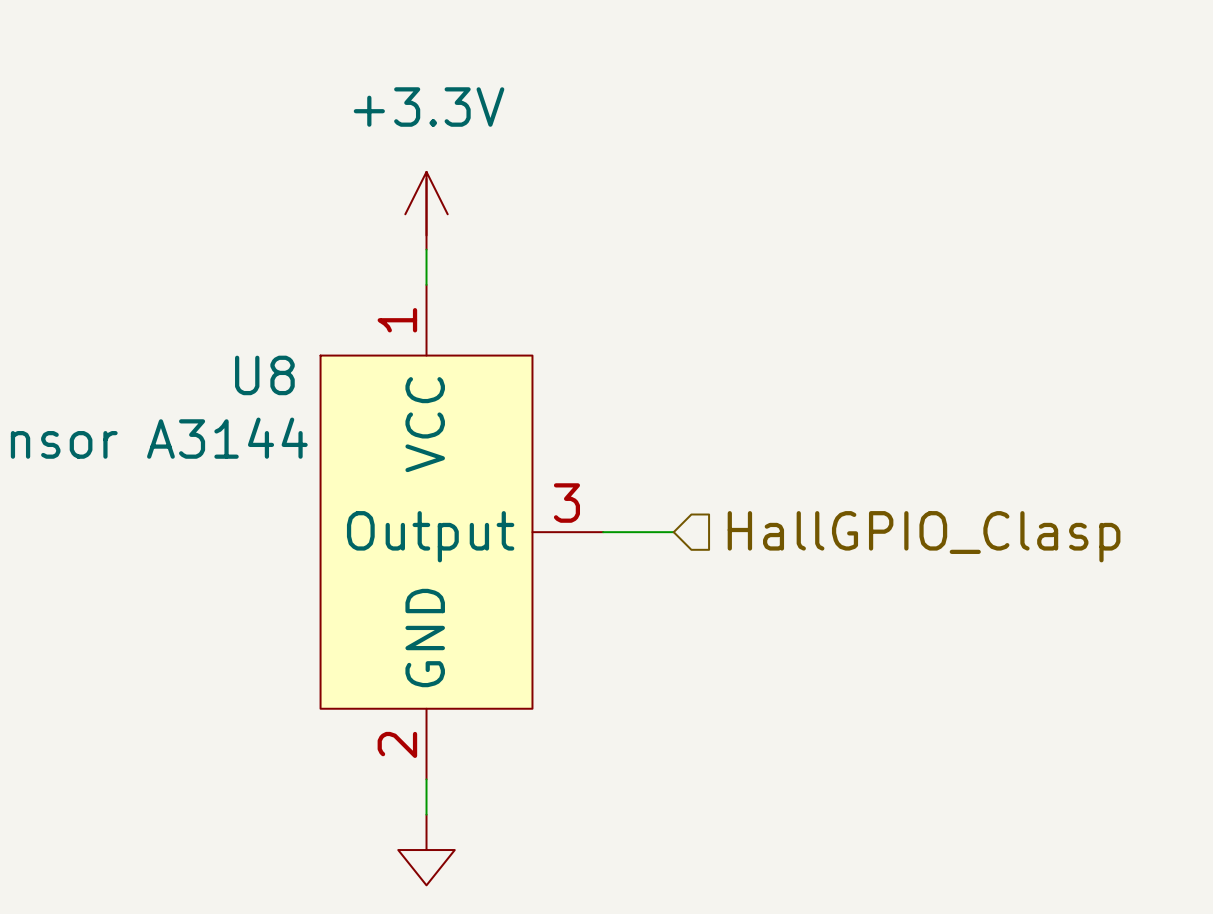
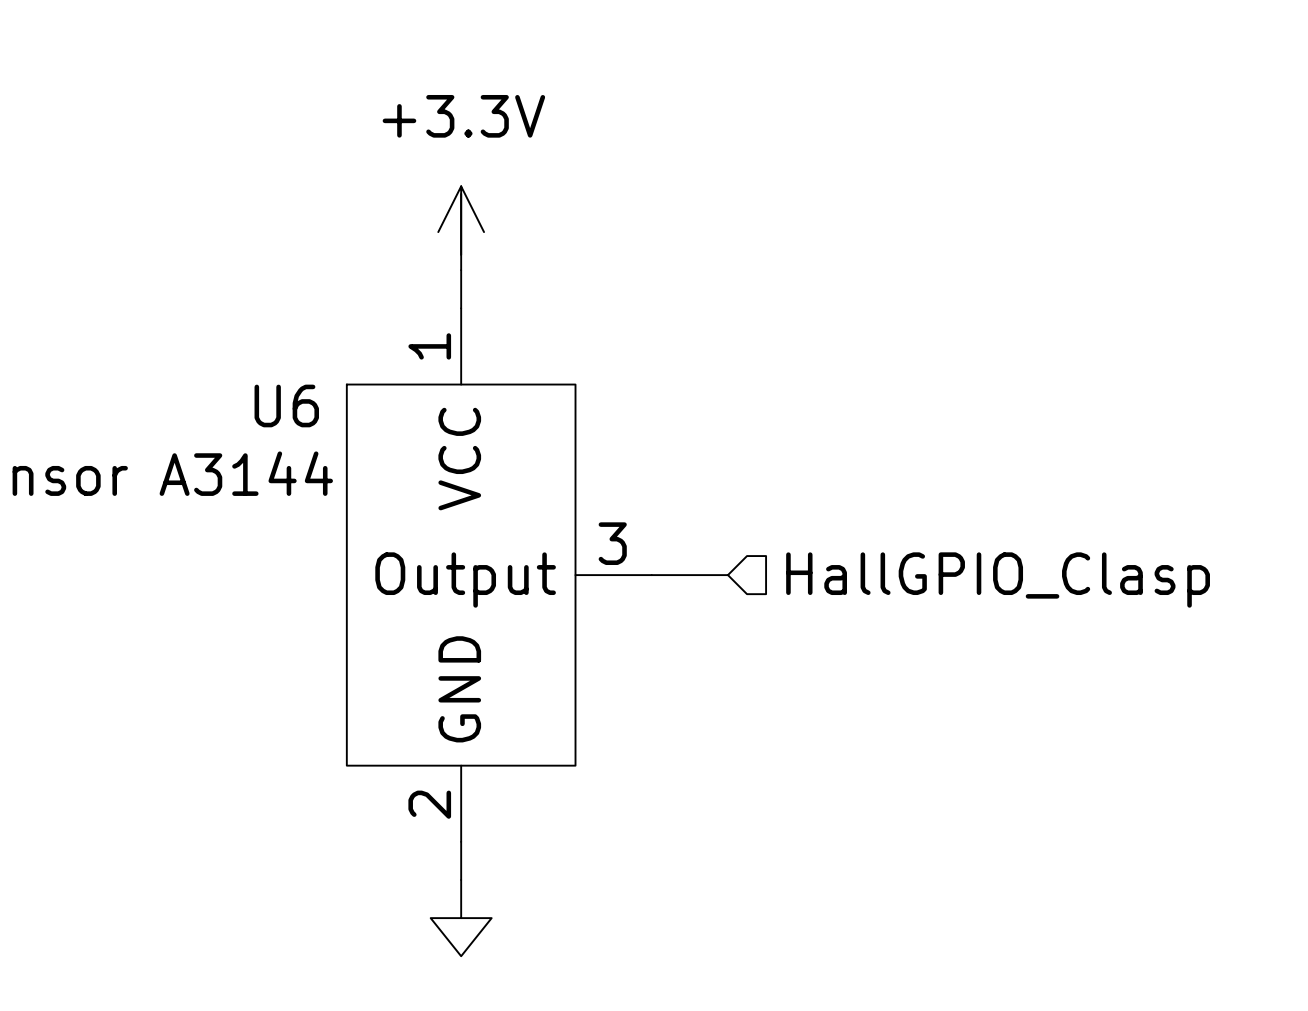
U8 name: U8 (264, 375) -> U6 (286, 405)

